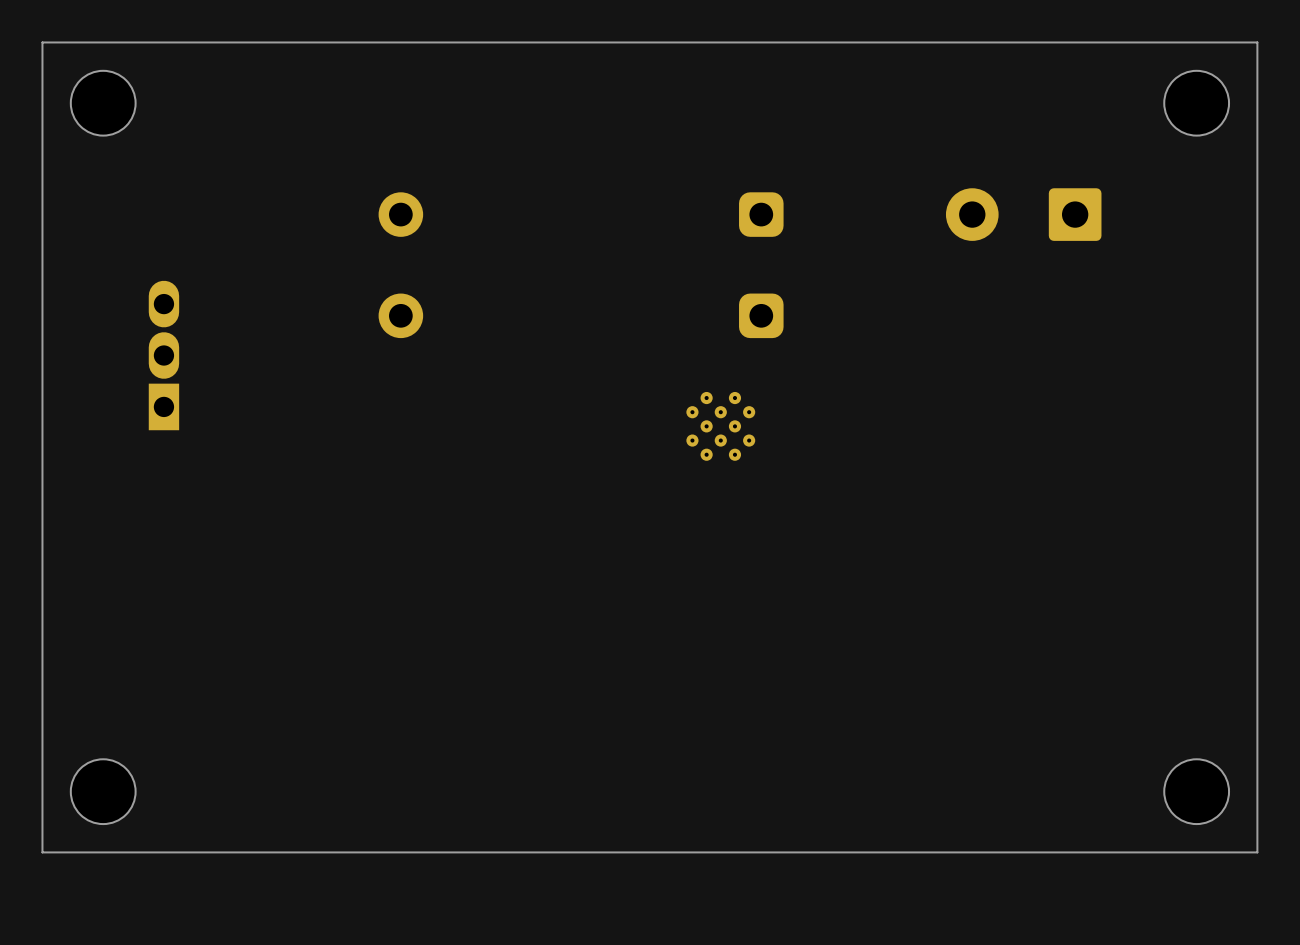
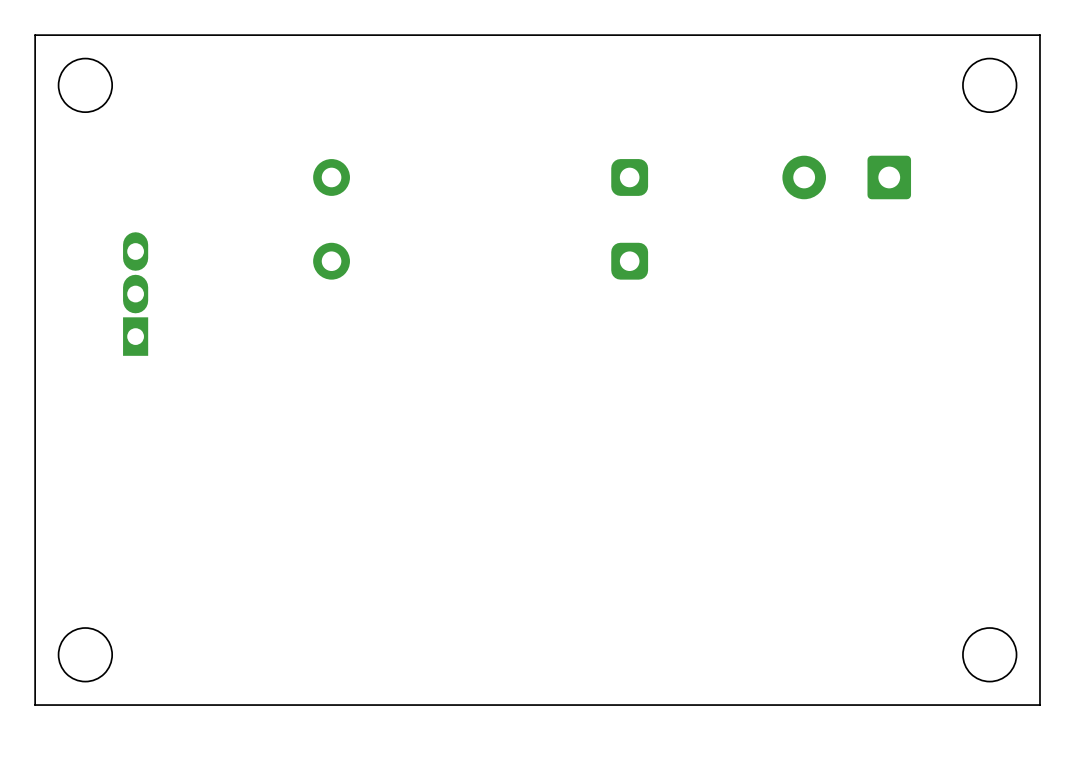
part: (720, 426) -> none

